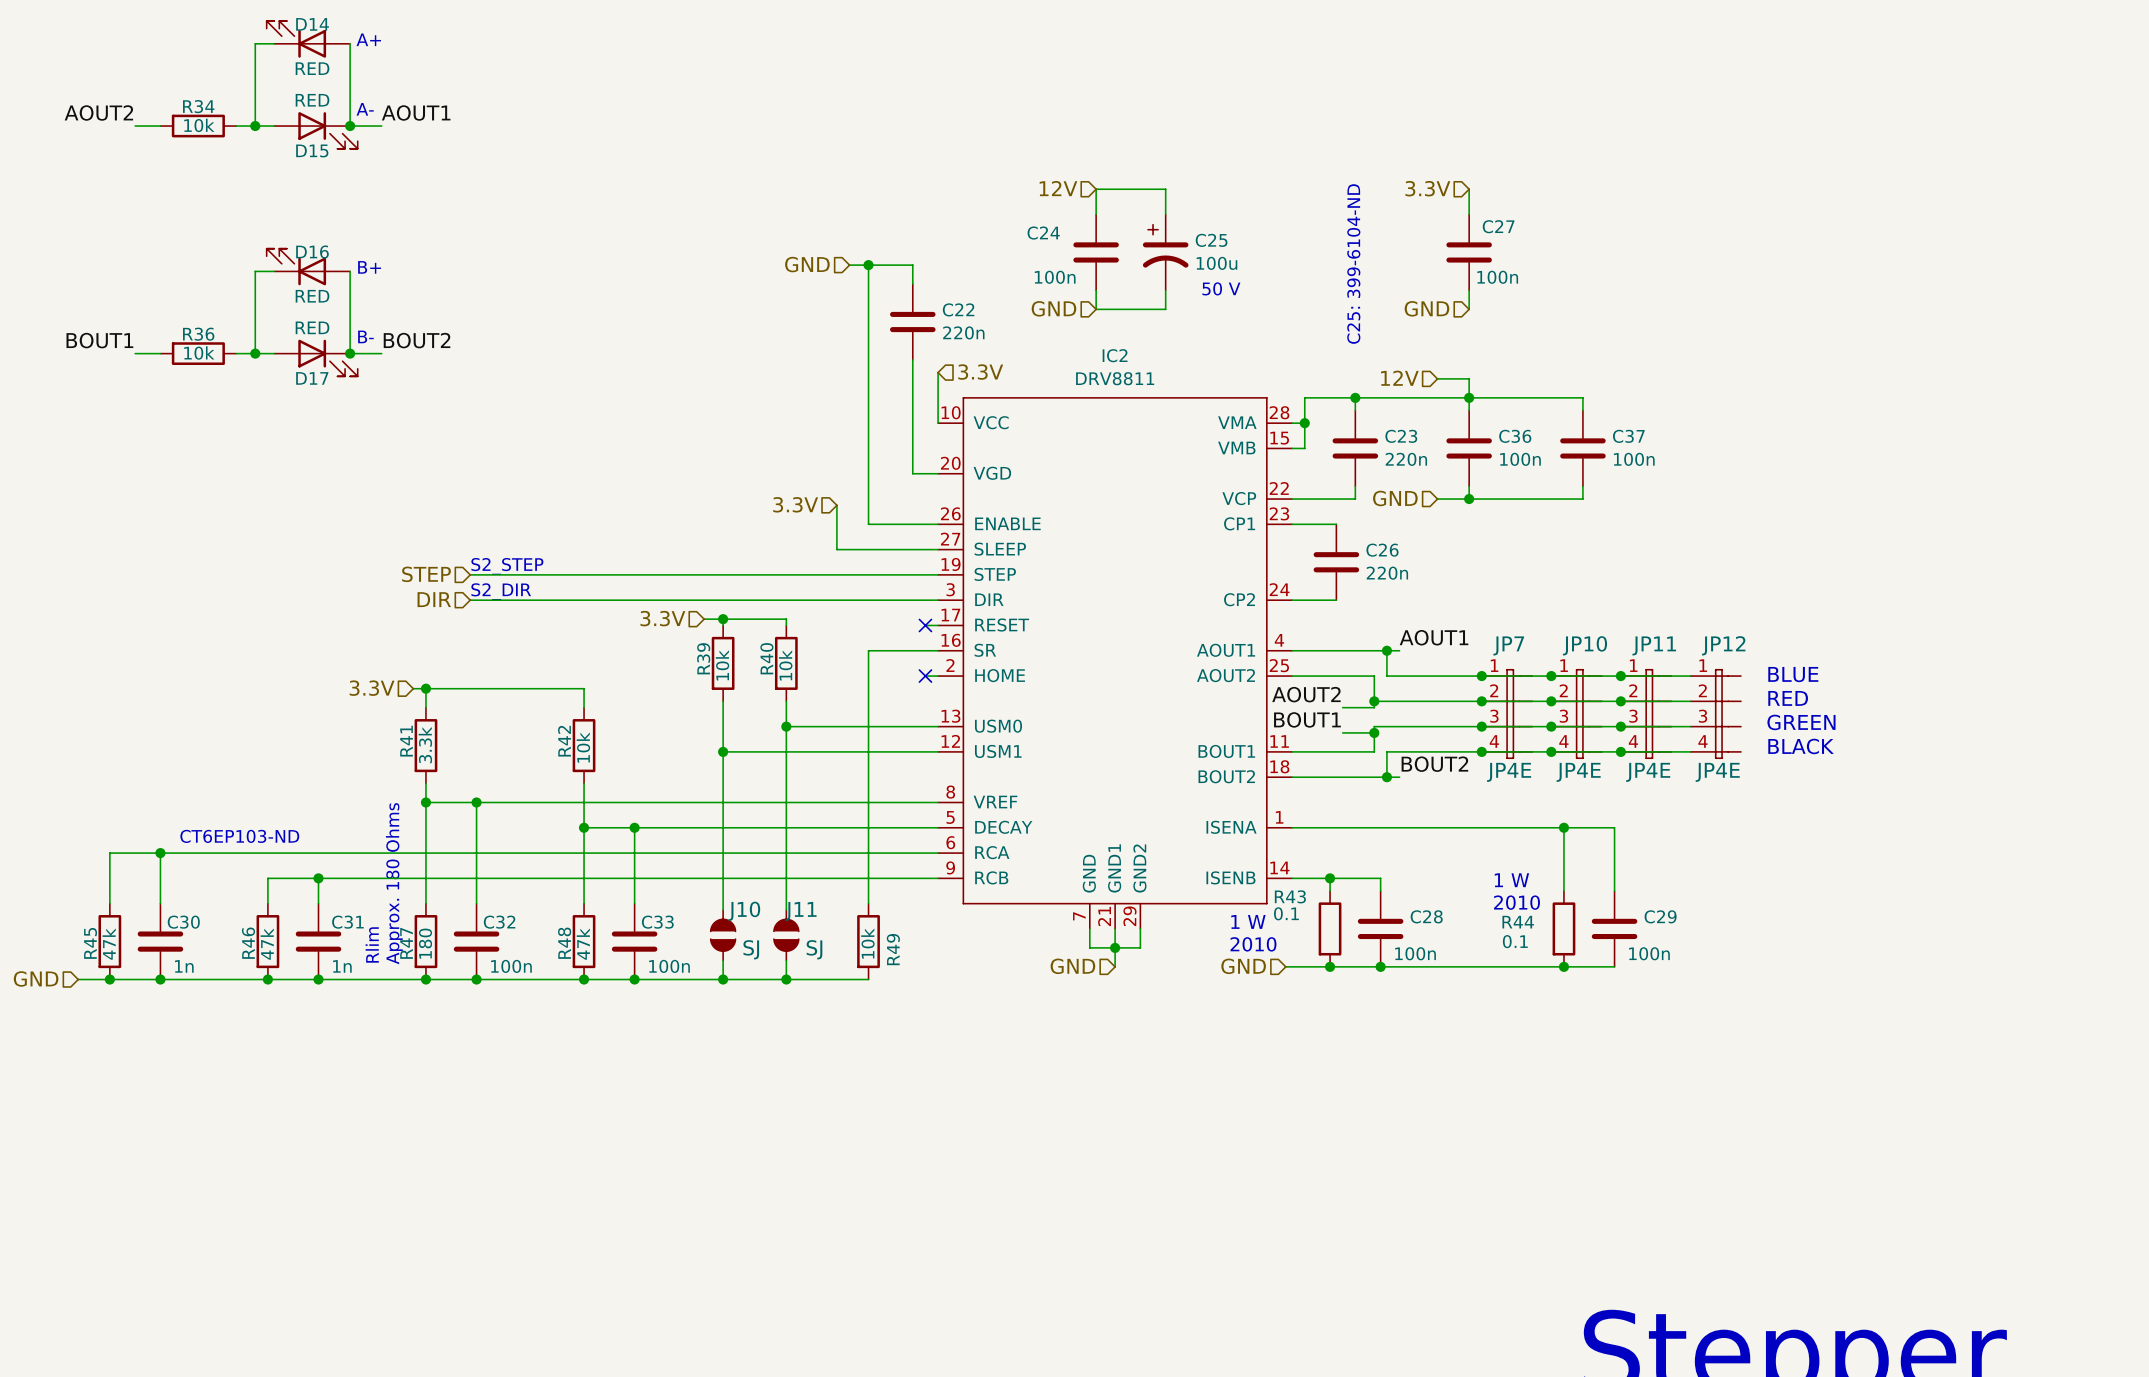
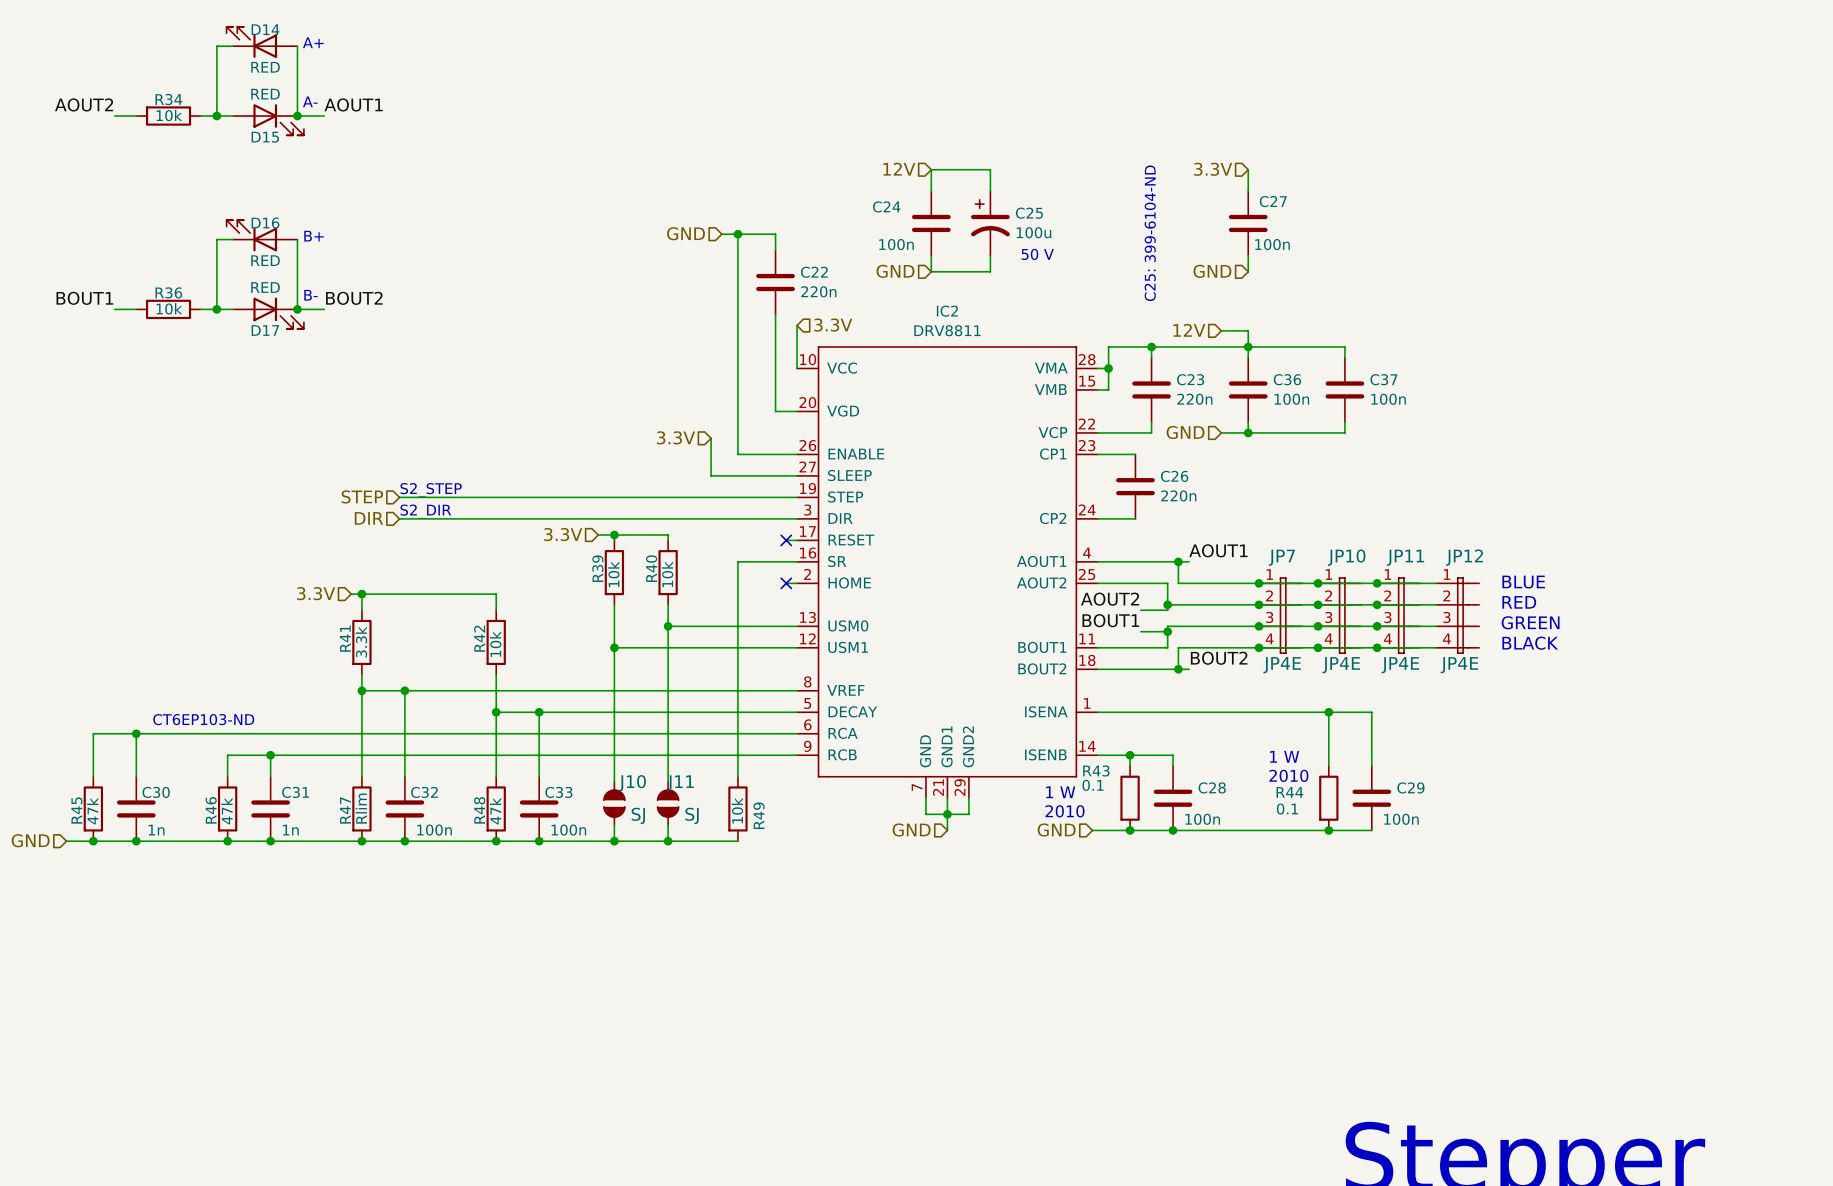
text: Approx. 180 Ohms (394, 883) -> none
R47 value: 180 (425, 943) -> Rlim (361, 808)
text: Rlim (372, 944) -> none

